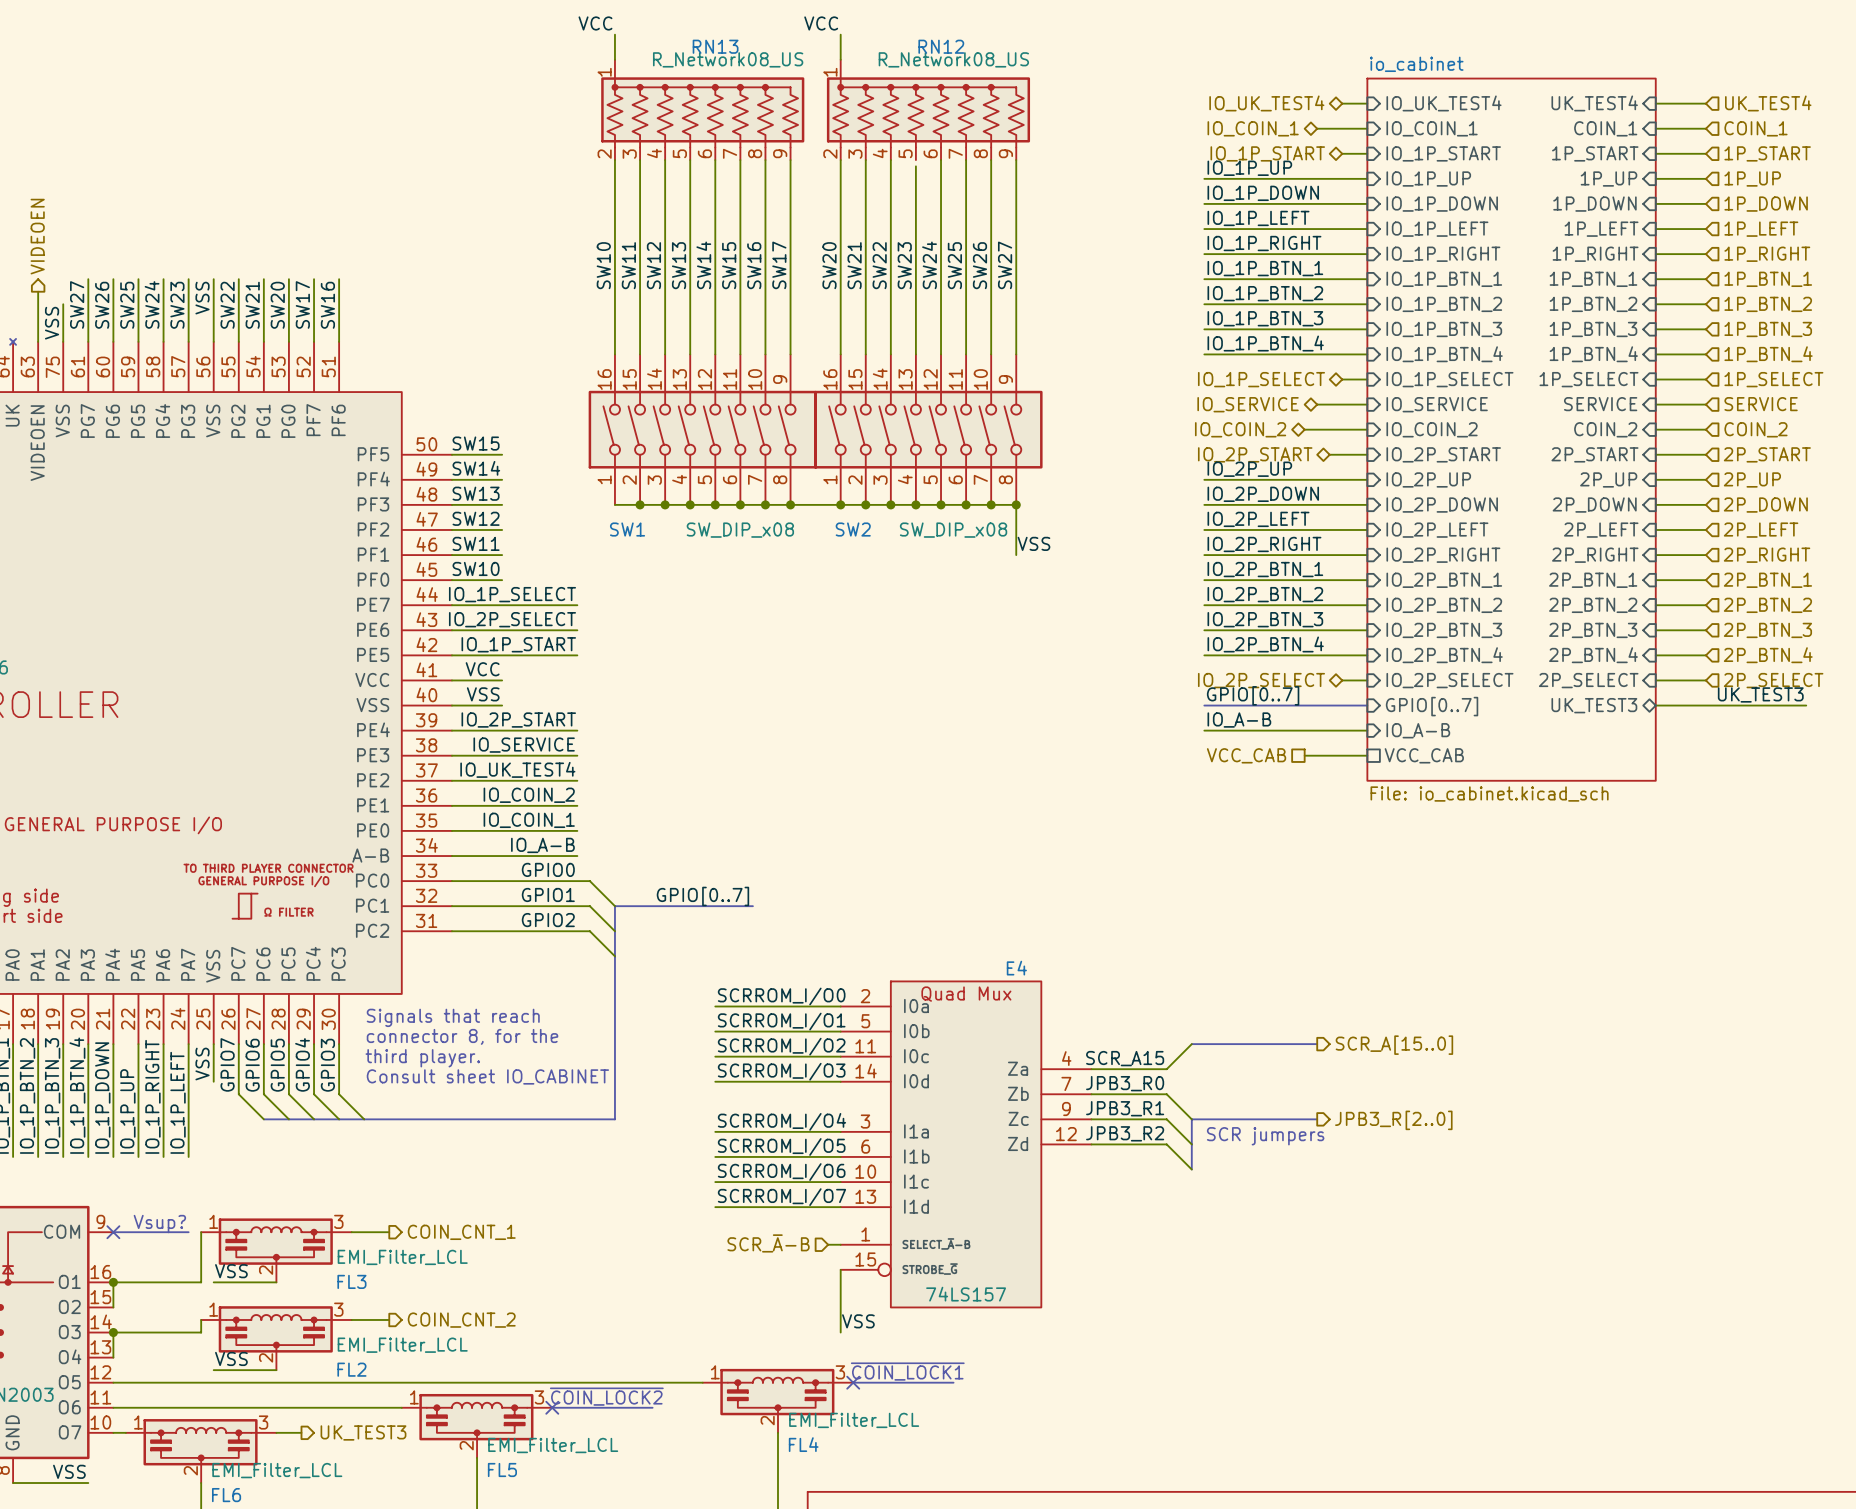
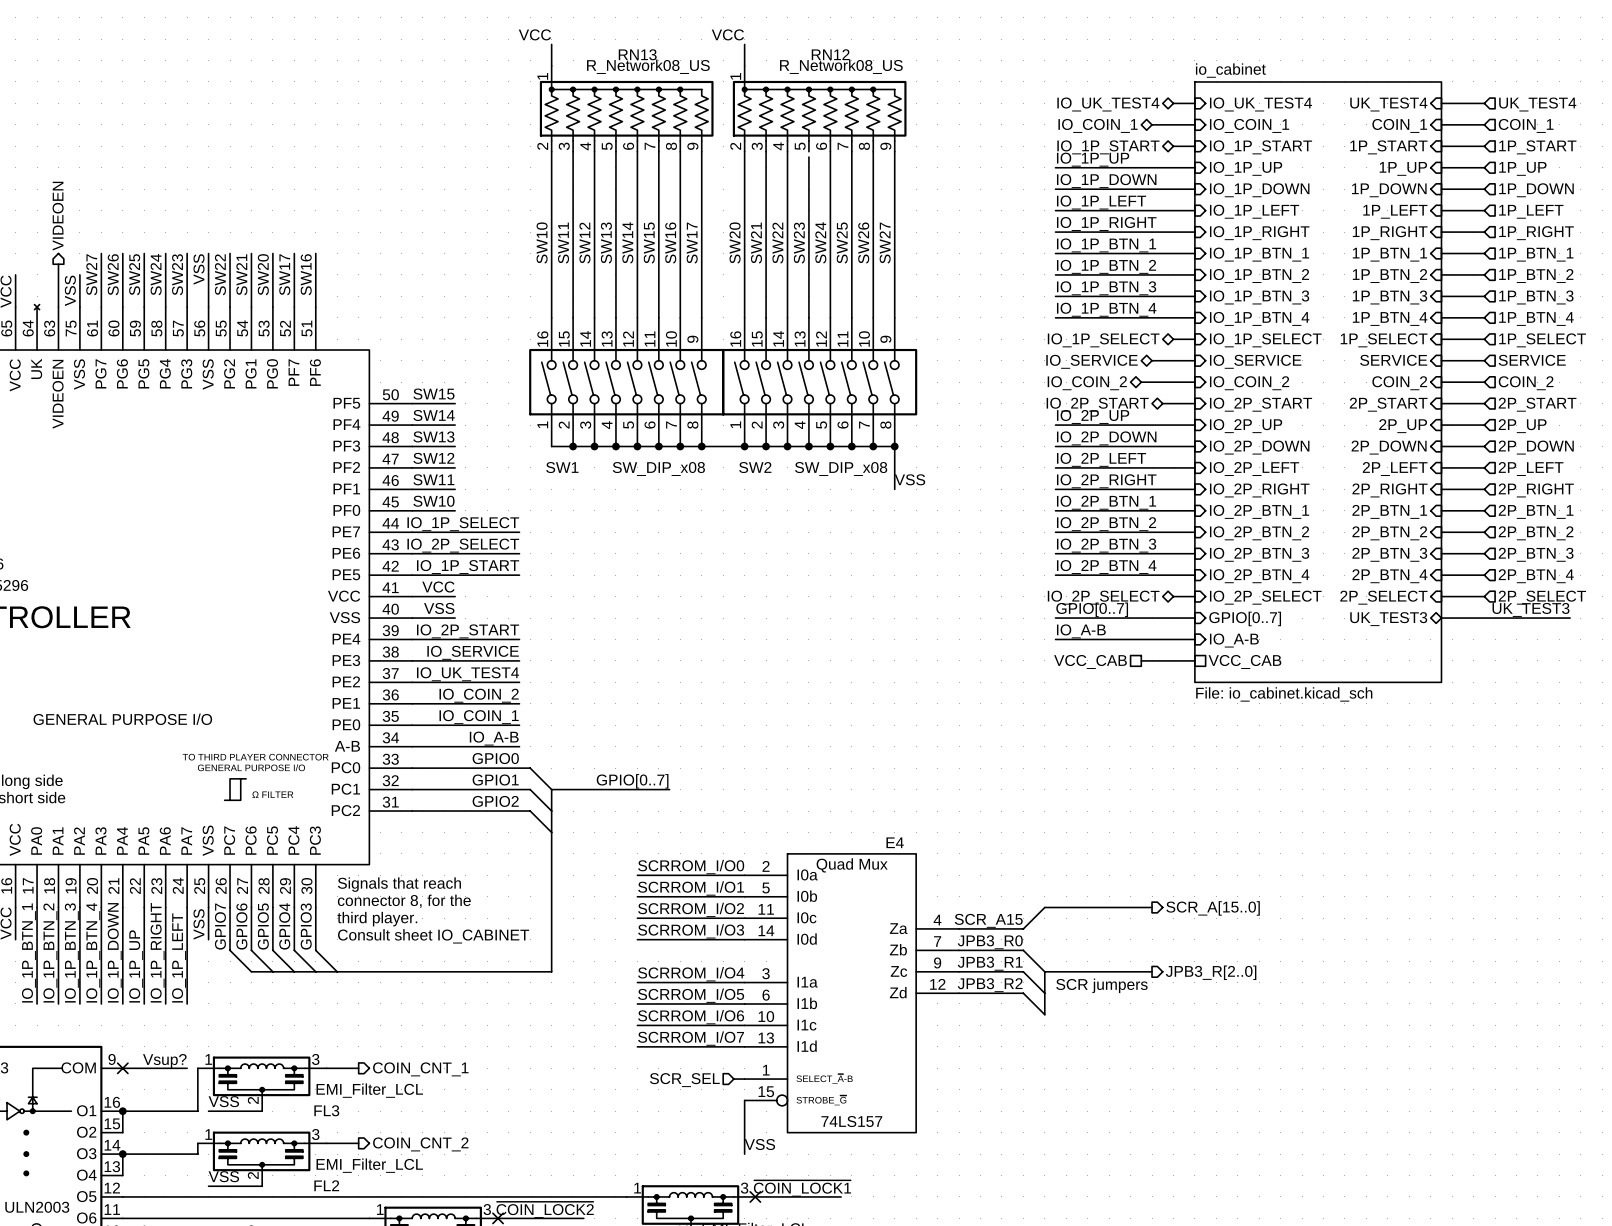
hierarchical label: SCR_~{A}-B (768, 1243) -> SCR_SEL (684, 1080)

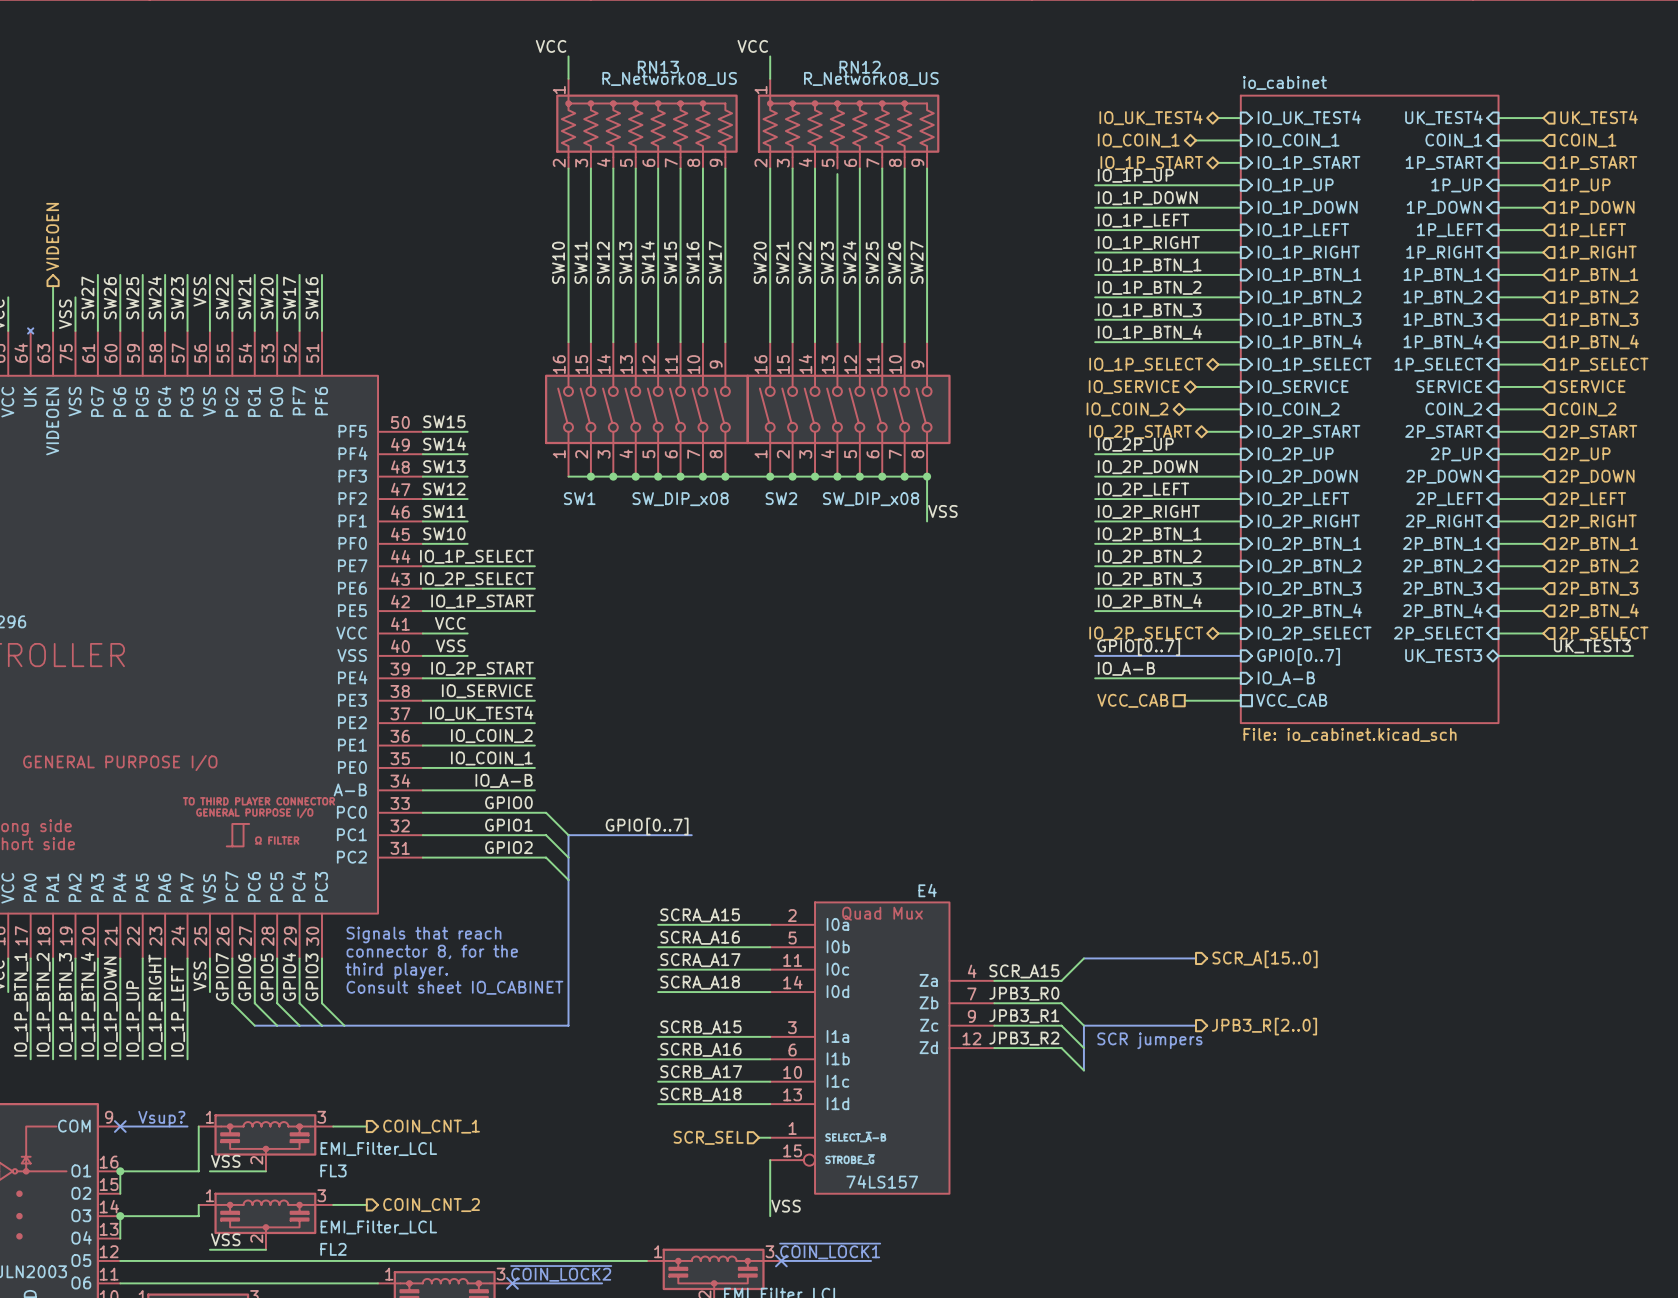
label: SCRROM_I/O0 (691, 867) -> SCRA_A15 (700, 915)
label: SCRROM_I/O1 (691, 888) -> SCRA_A16 (700, 937)
label: SCRROM_I/O2 (691, 909) -> SCRA_A17 (700, 960)
label: SCRROM_I/O3 (691, 931) -> SCRA_A18 (700, 982)
label: SCRROM_I/O4 (691, 974) -> SCRB_A15 (700, 1027)
label: SCRROM_I/O5 (691, 995) -> SCRB_A16 (700, 1049)
label: SCRROM_I/O6 (691, 1017) -> SCRB_A17 (701, 1072)
label: SCRROM_I/O7 (691, 1038) -> SCRB_A18 (700, 1094)

